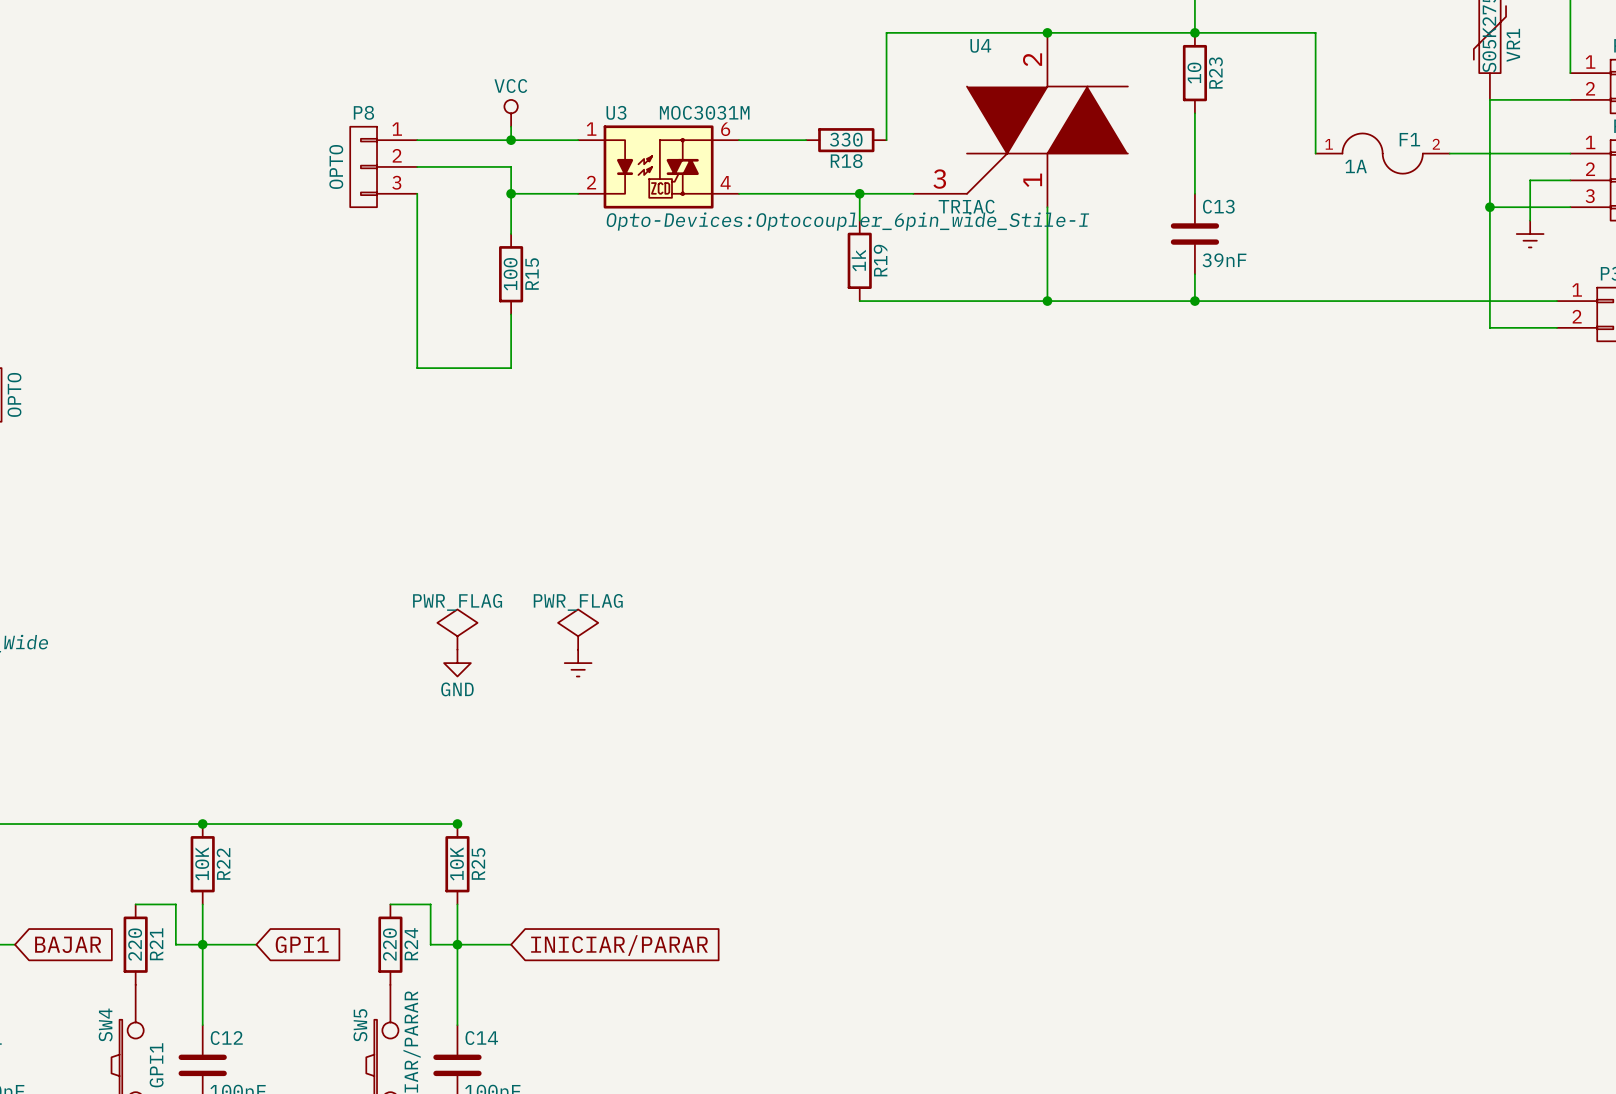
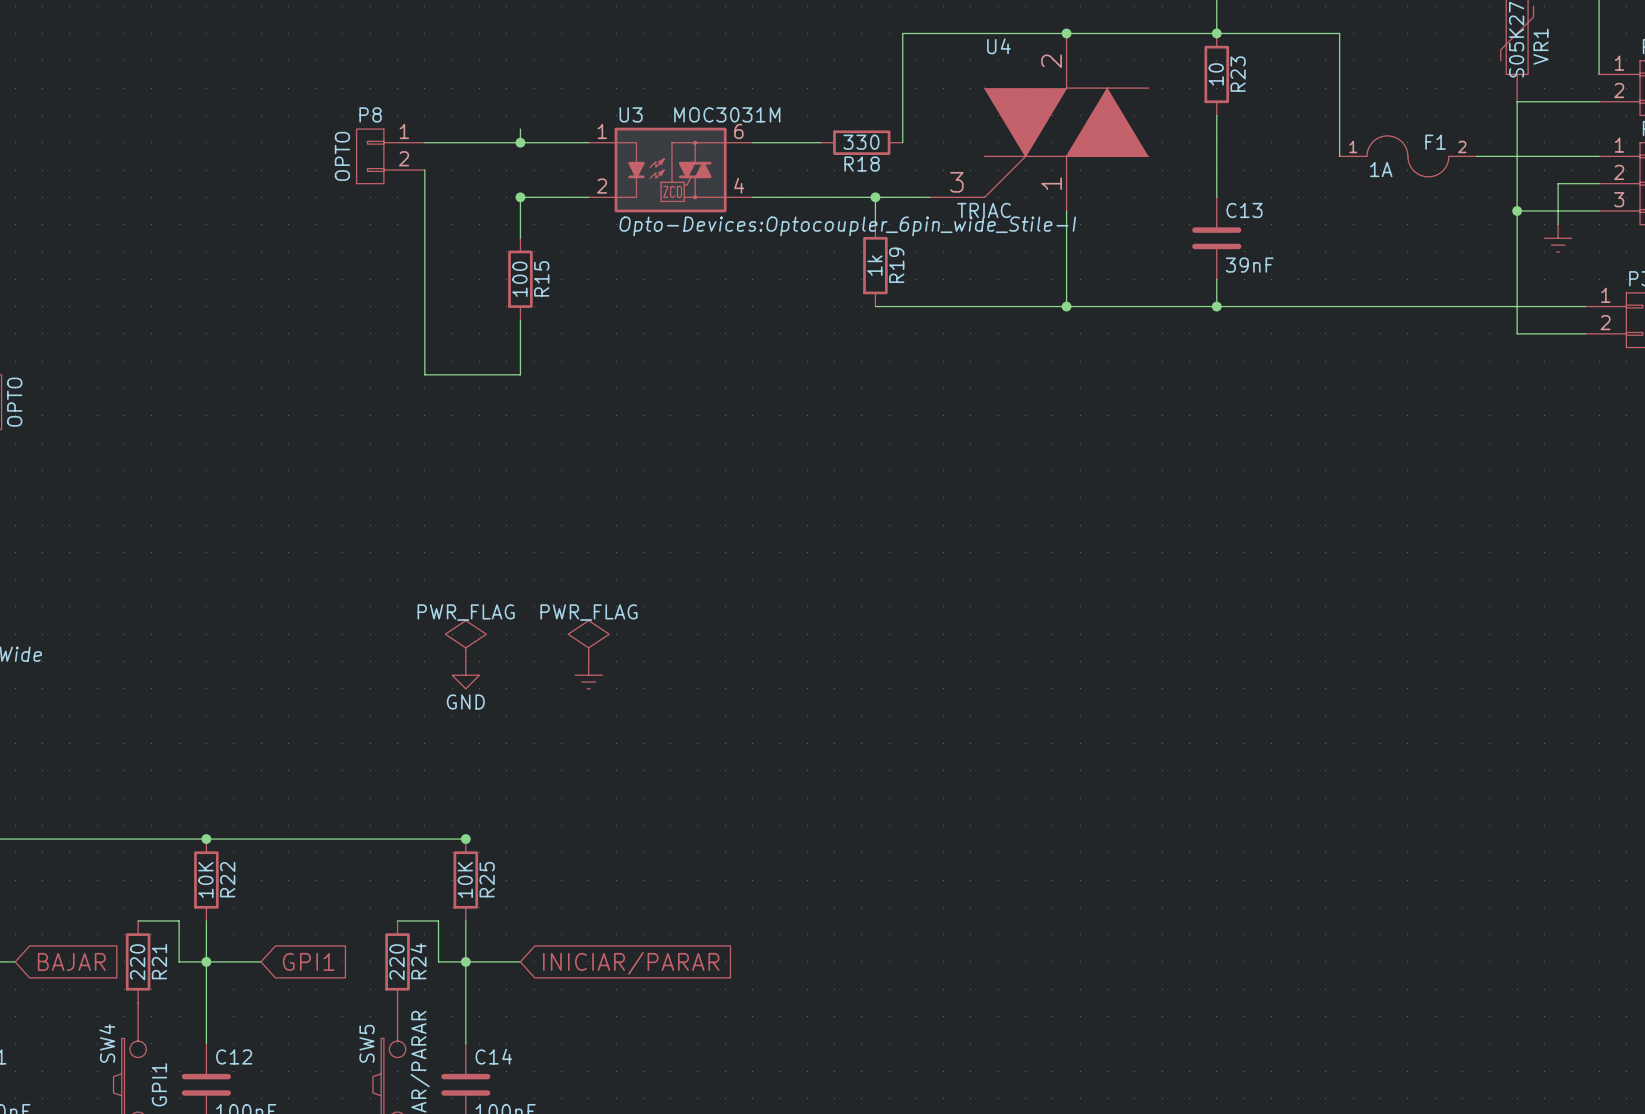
power symbol: VCC (511, 113) -> none
P8 symbol: [350, 126, 418, 208] -> [356, 129, 425, 184]
wire: (417, 166) (511, 166) (511, 193) -> (424, 170) (424, 197)

